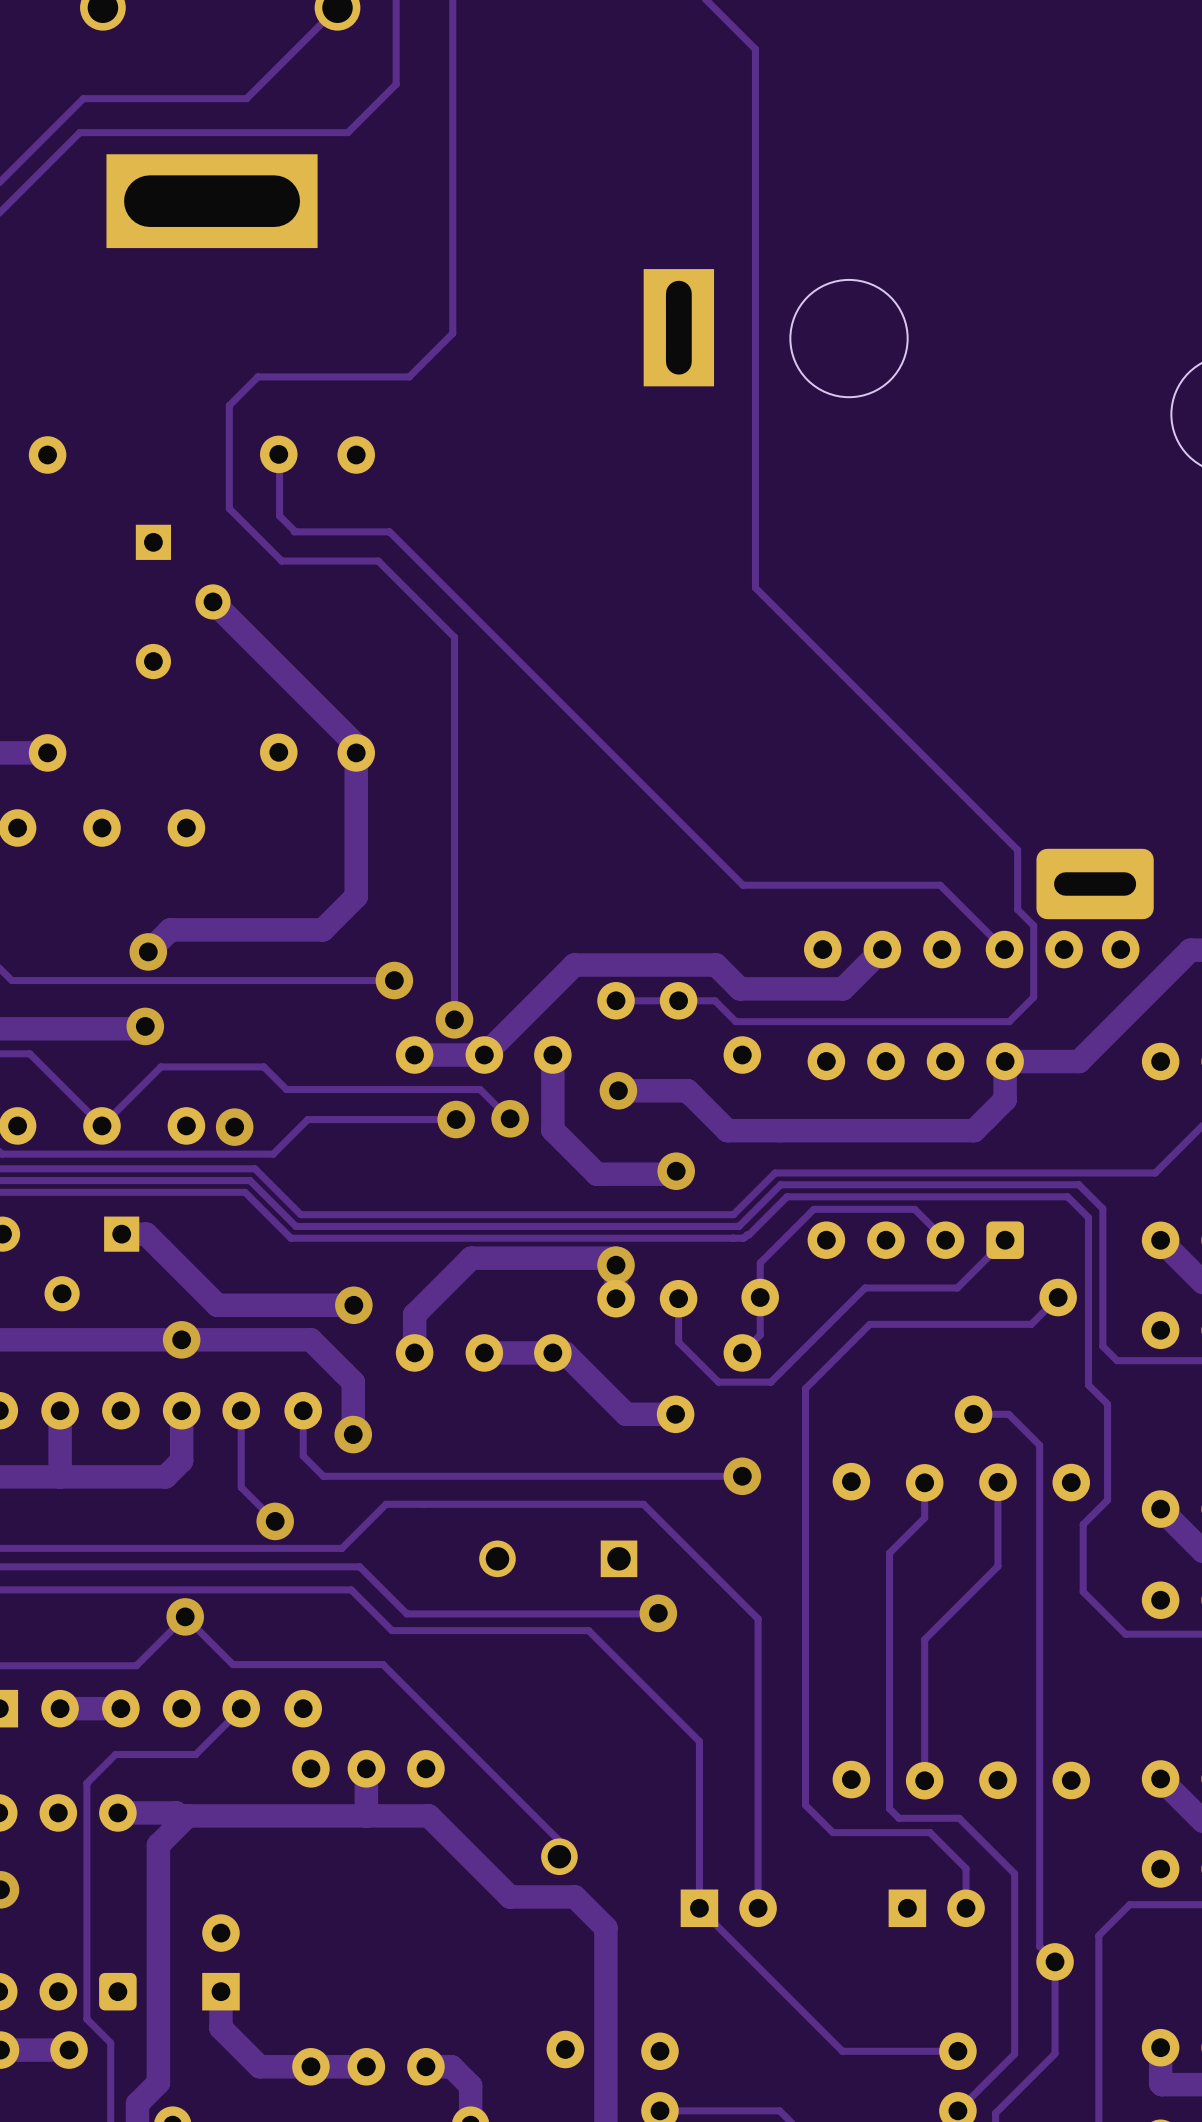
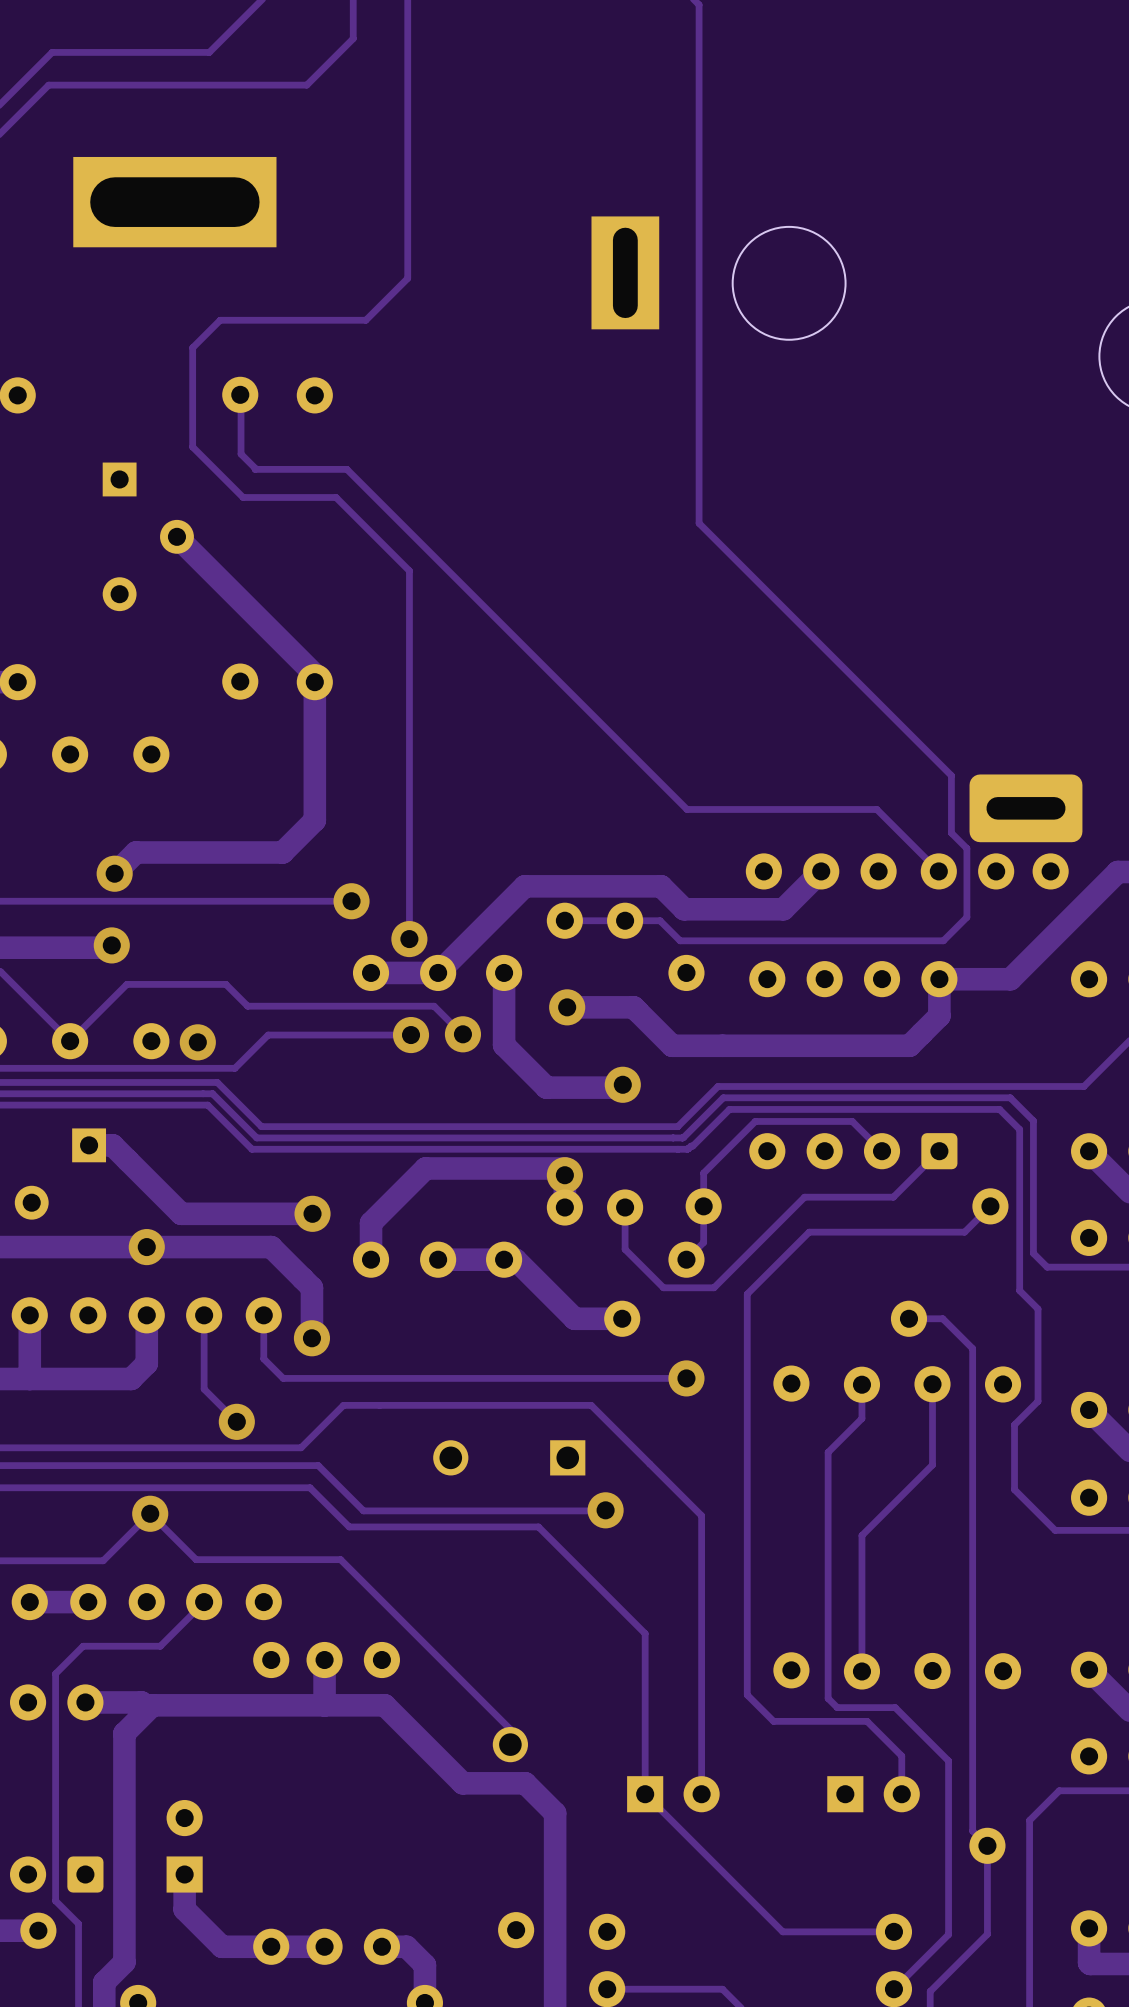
part position: (212, 201) -> (174, 202)

